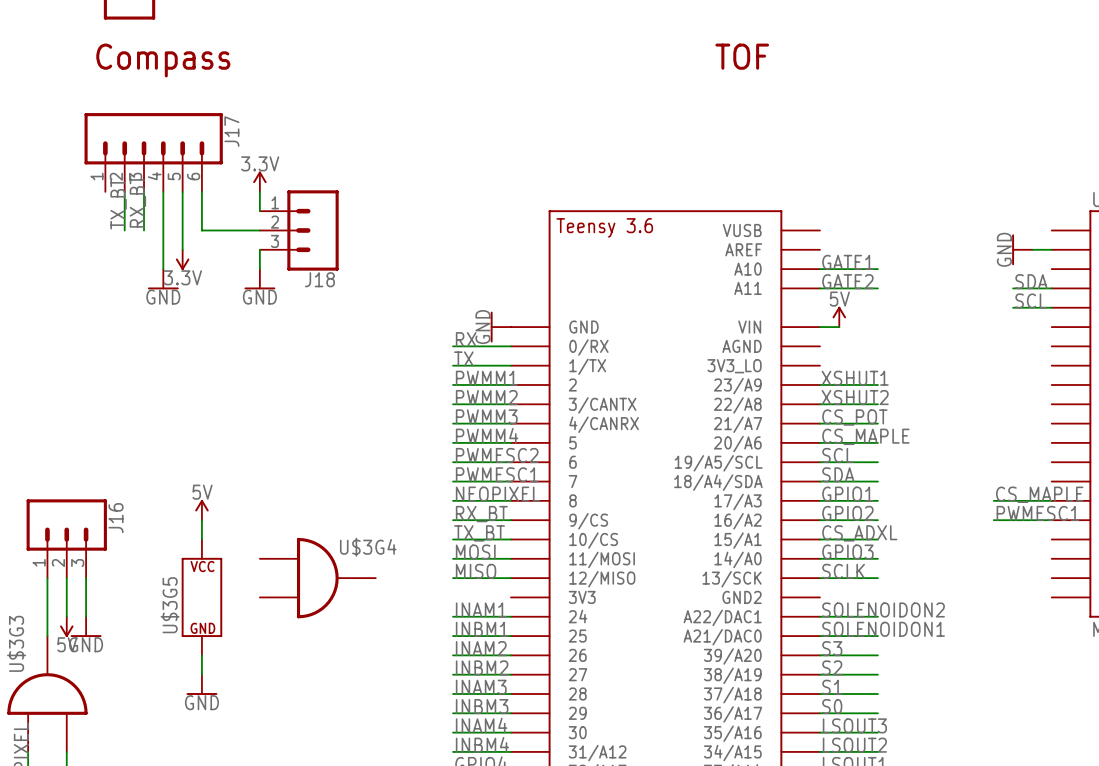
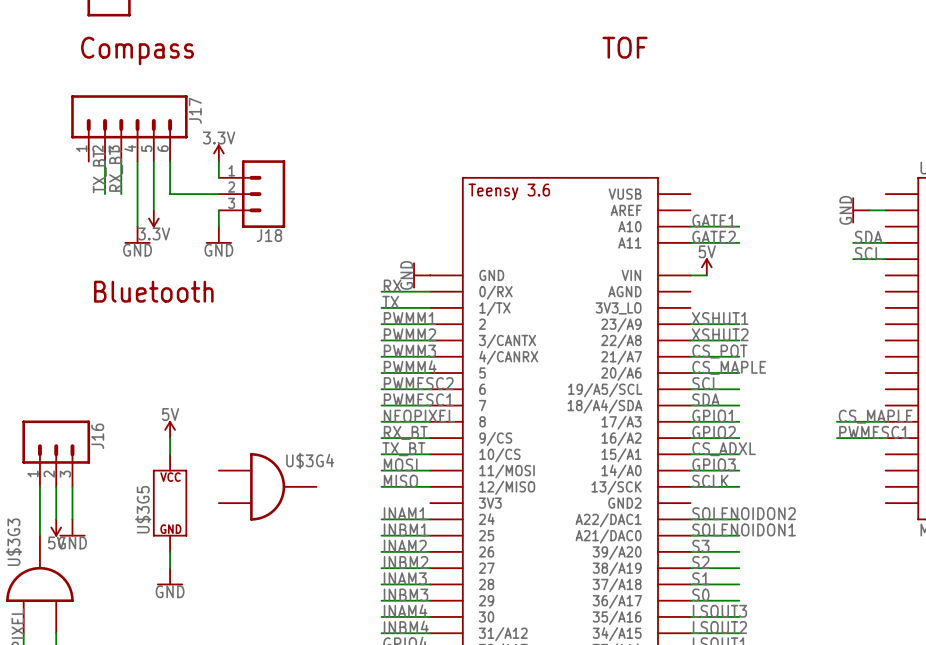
text: none -> Bluetooth (153, 291)

